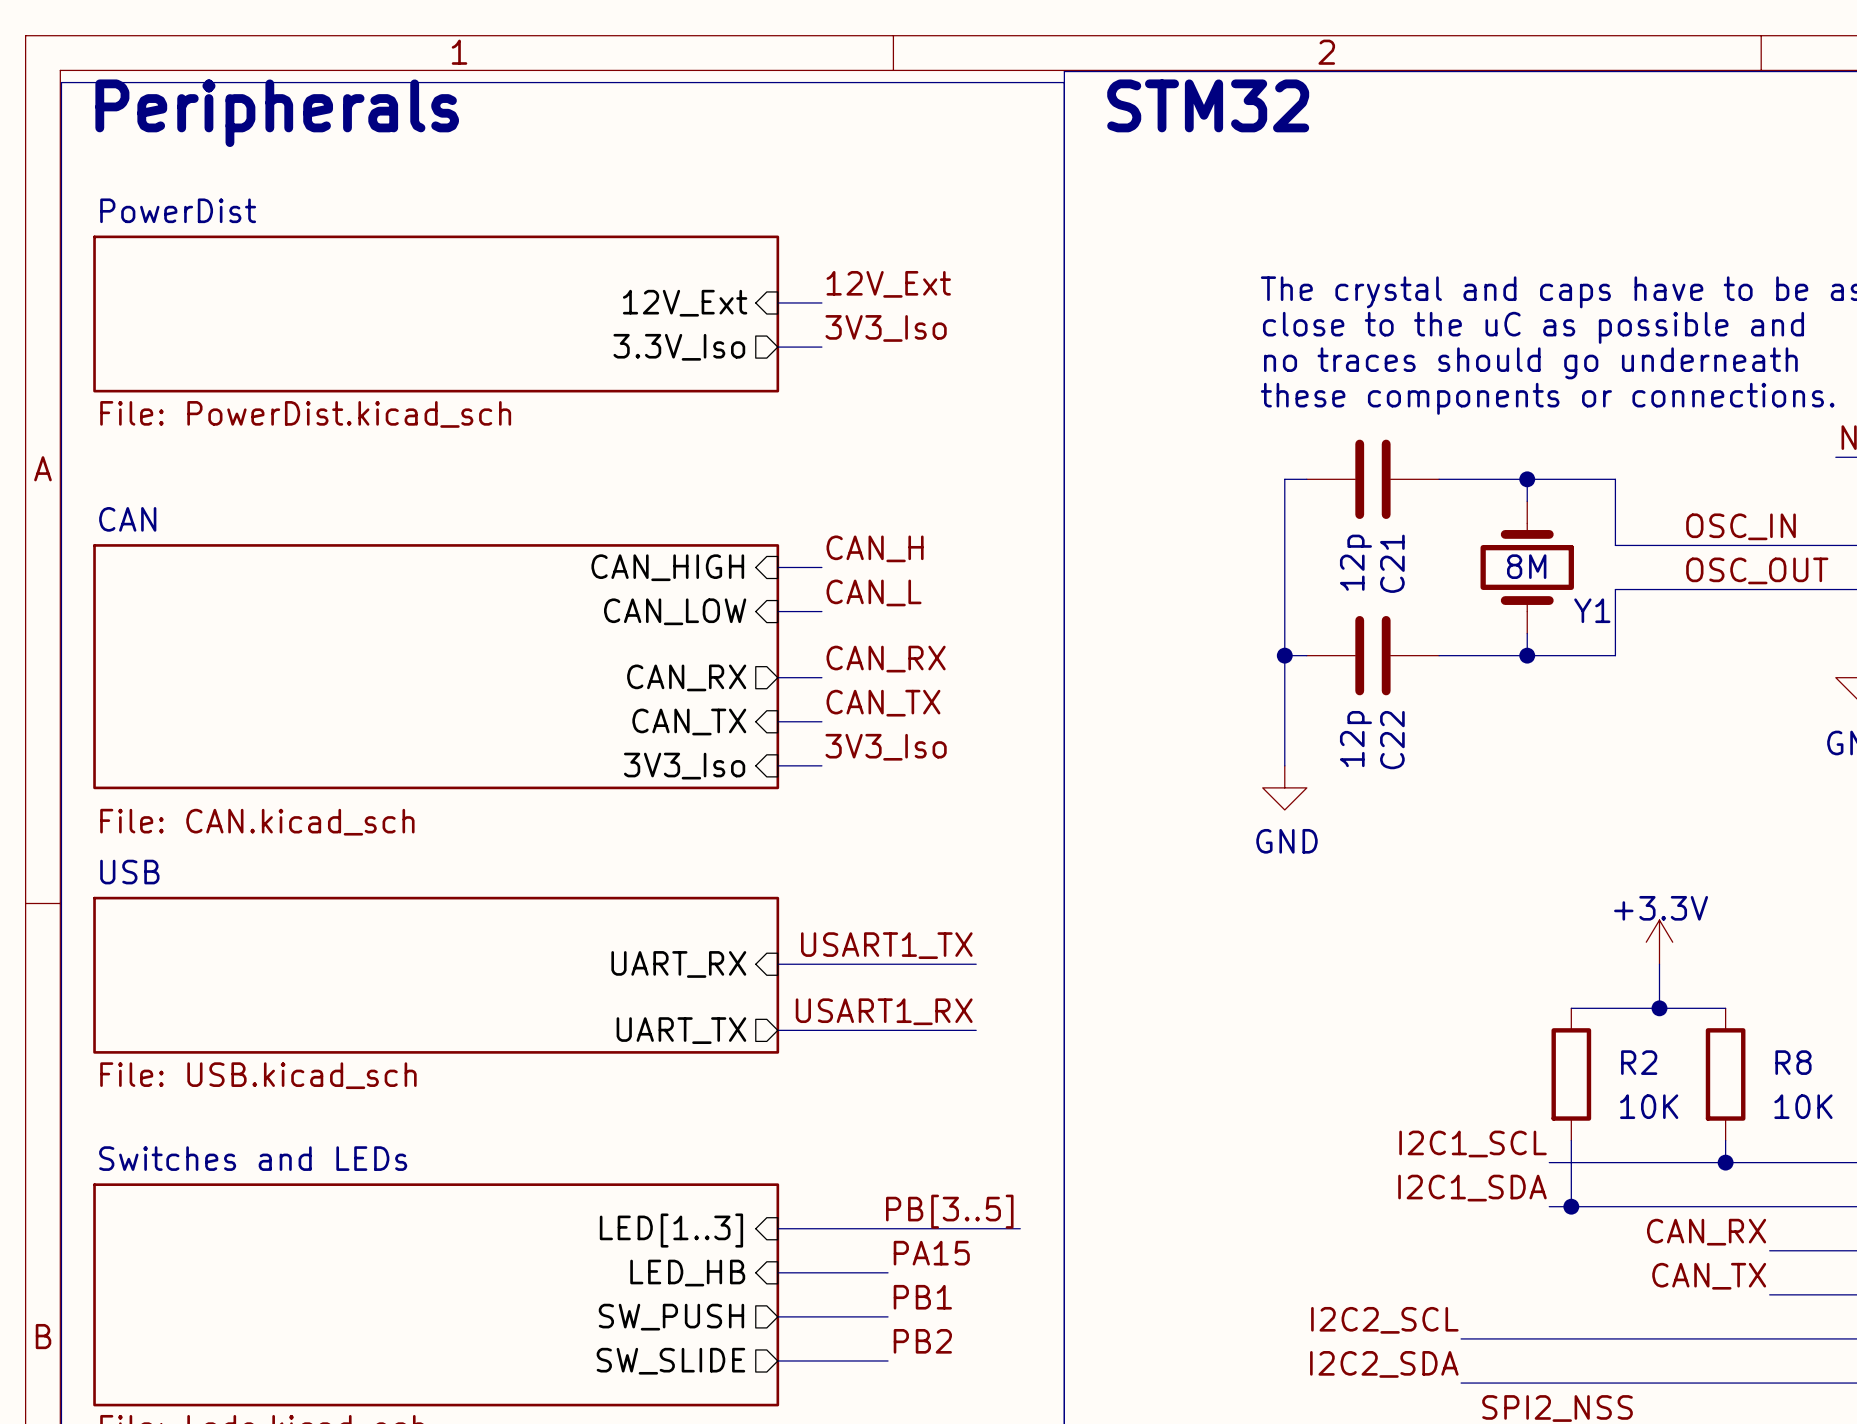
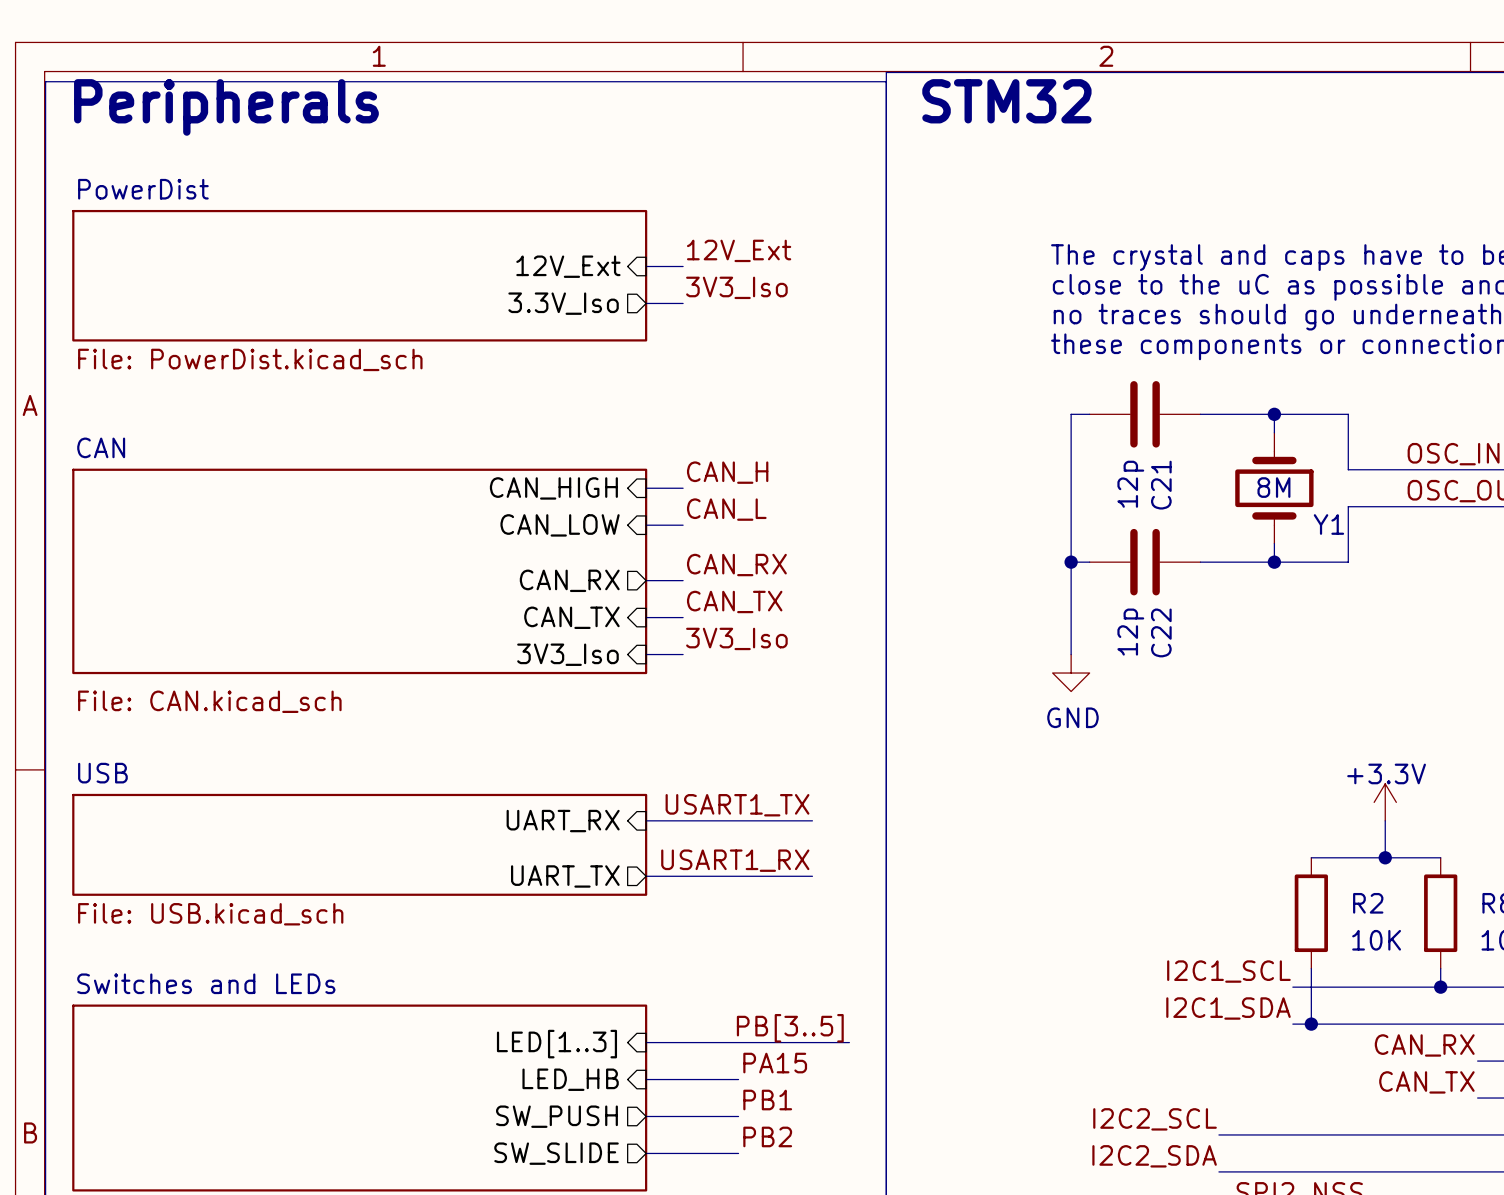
sheet USB: File: USB.kicad_sch (436, 975) -> none
sheet USB: none -> File: USB.kicad_sch (359, 844)

